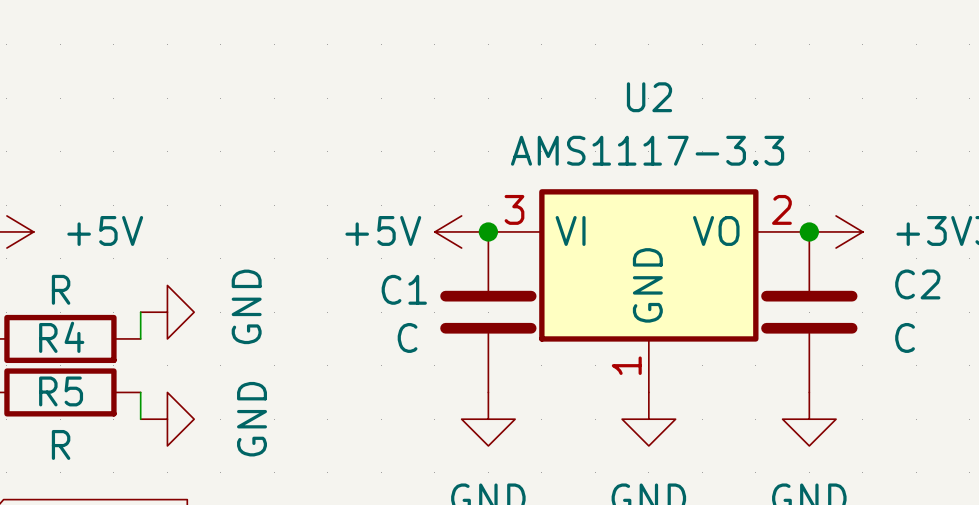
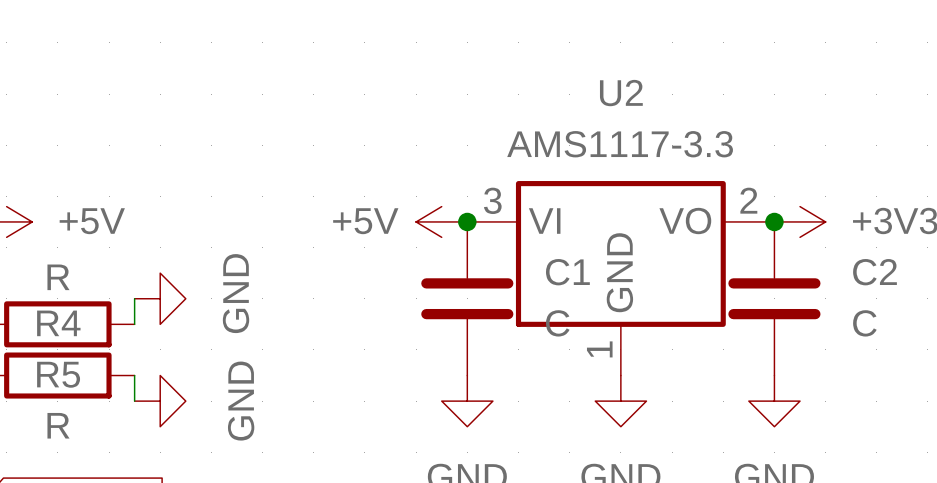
C1 name position: C1 (404, 289) -> C1 (567, 272)
C1 value position: C (407, 337) -> C (557, 323)

